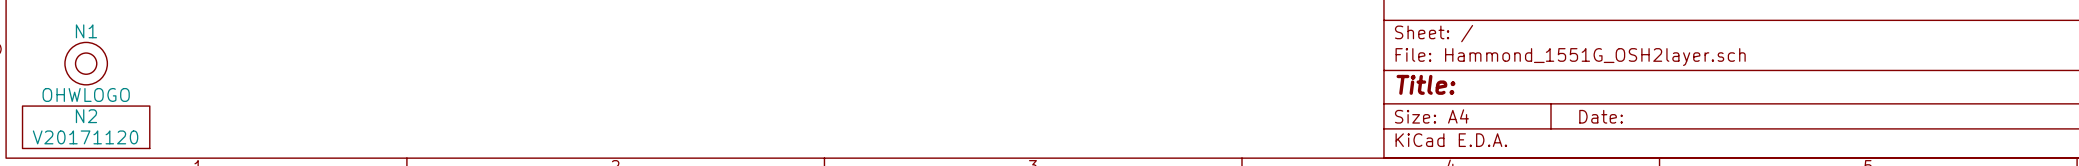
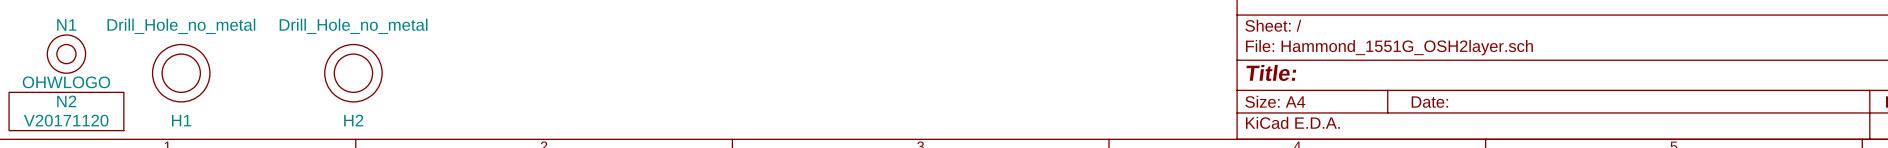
H1: none -> Drill_Hole_no_metal (181, 73)
H2: none -> Drill_Hole_no_metal (353, 73)

